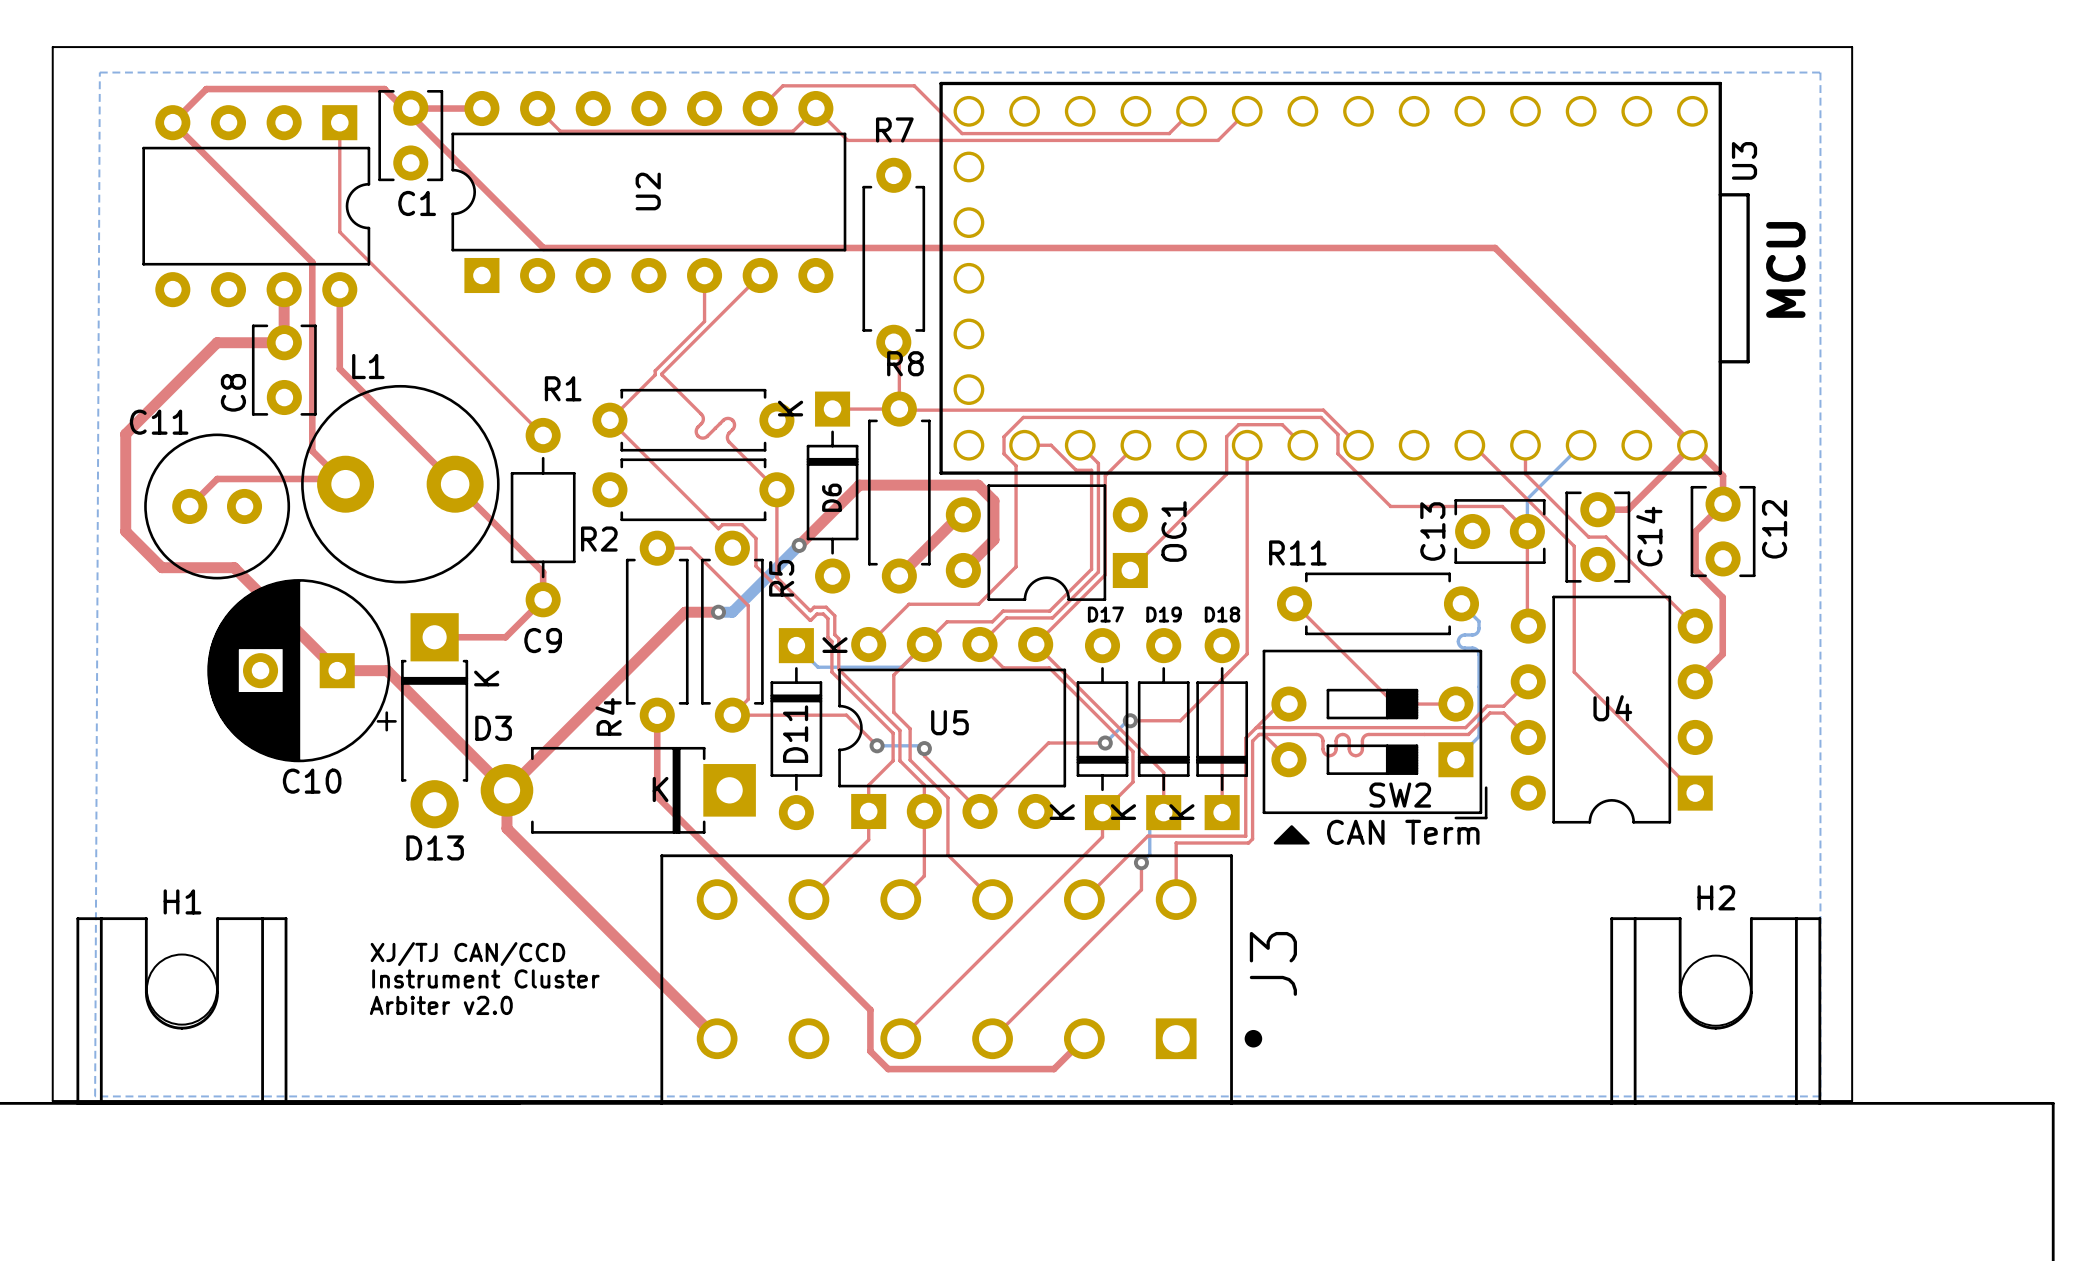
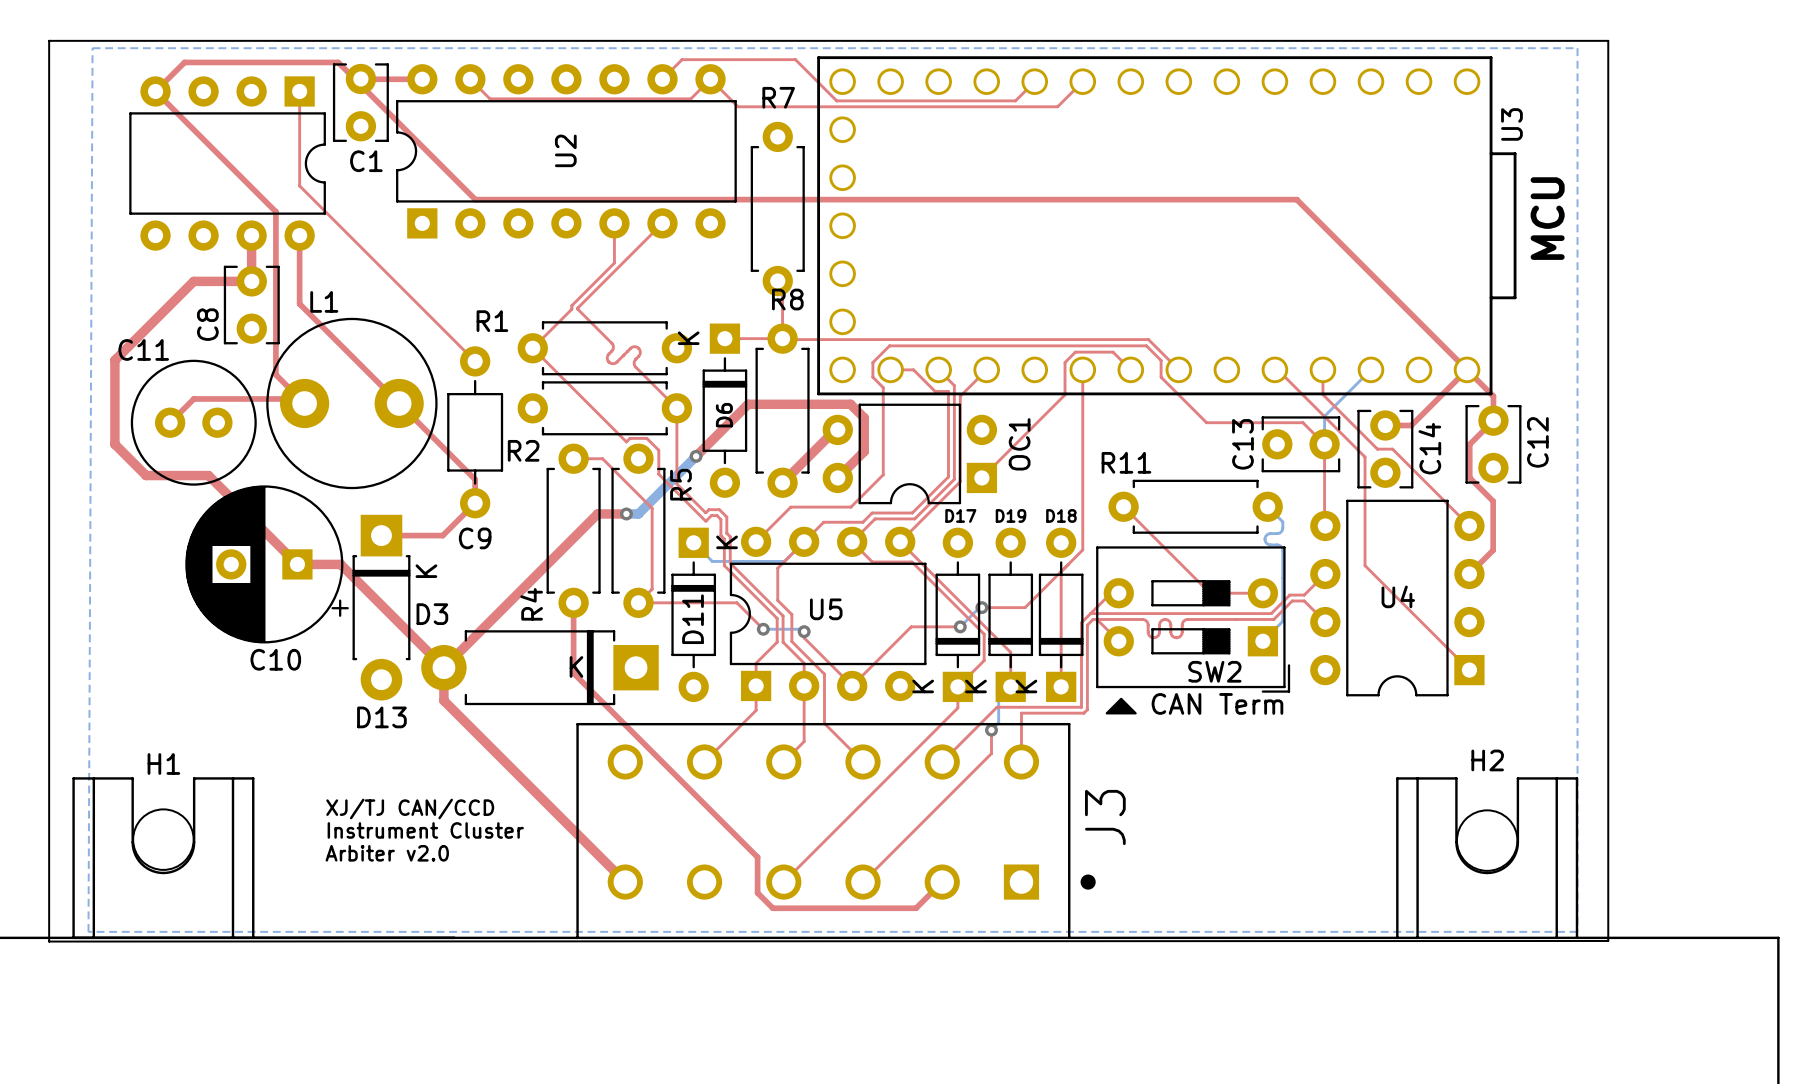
board edge: (52, 47) (1852, 47) (1852, 1101) (52, 1101) (52, 47) -> (49, 40) (1608, 40) (1608, 940) (49, 941) (49, 40)

